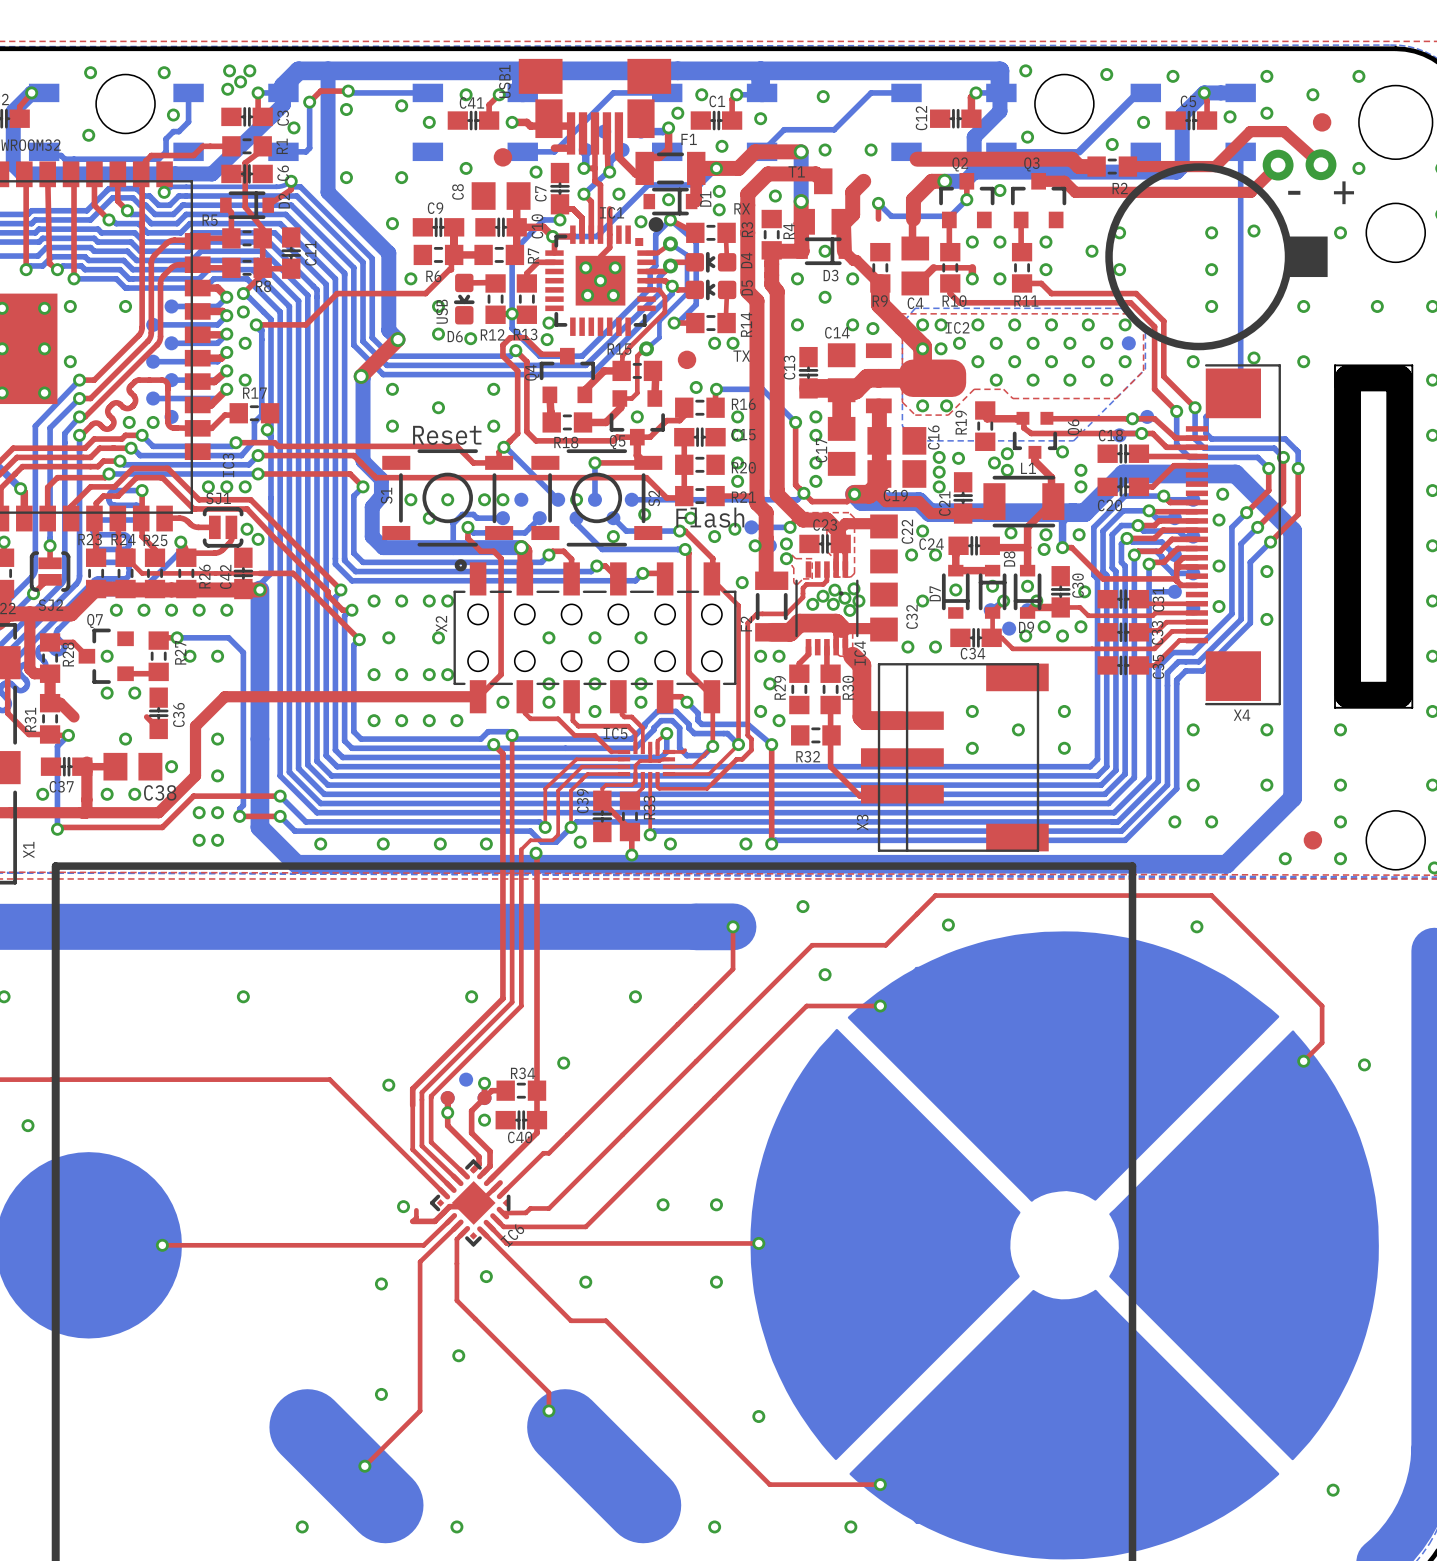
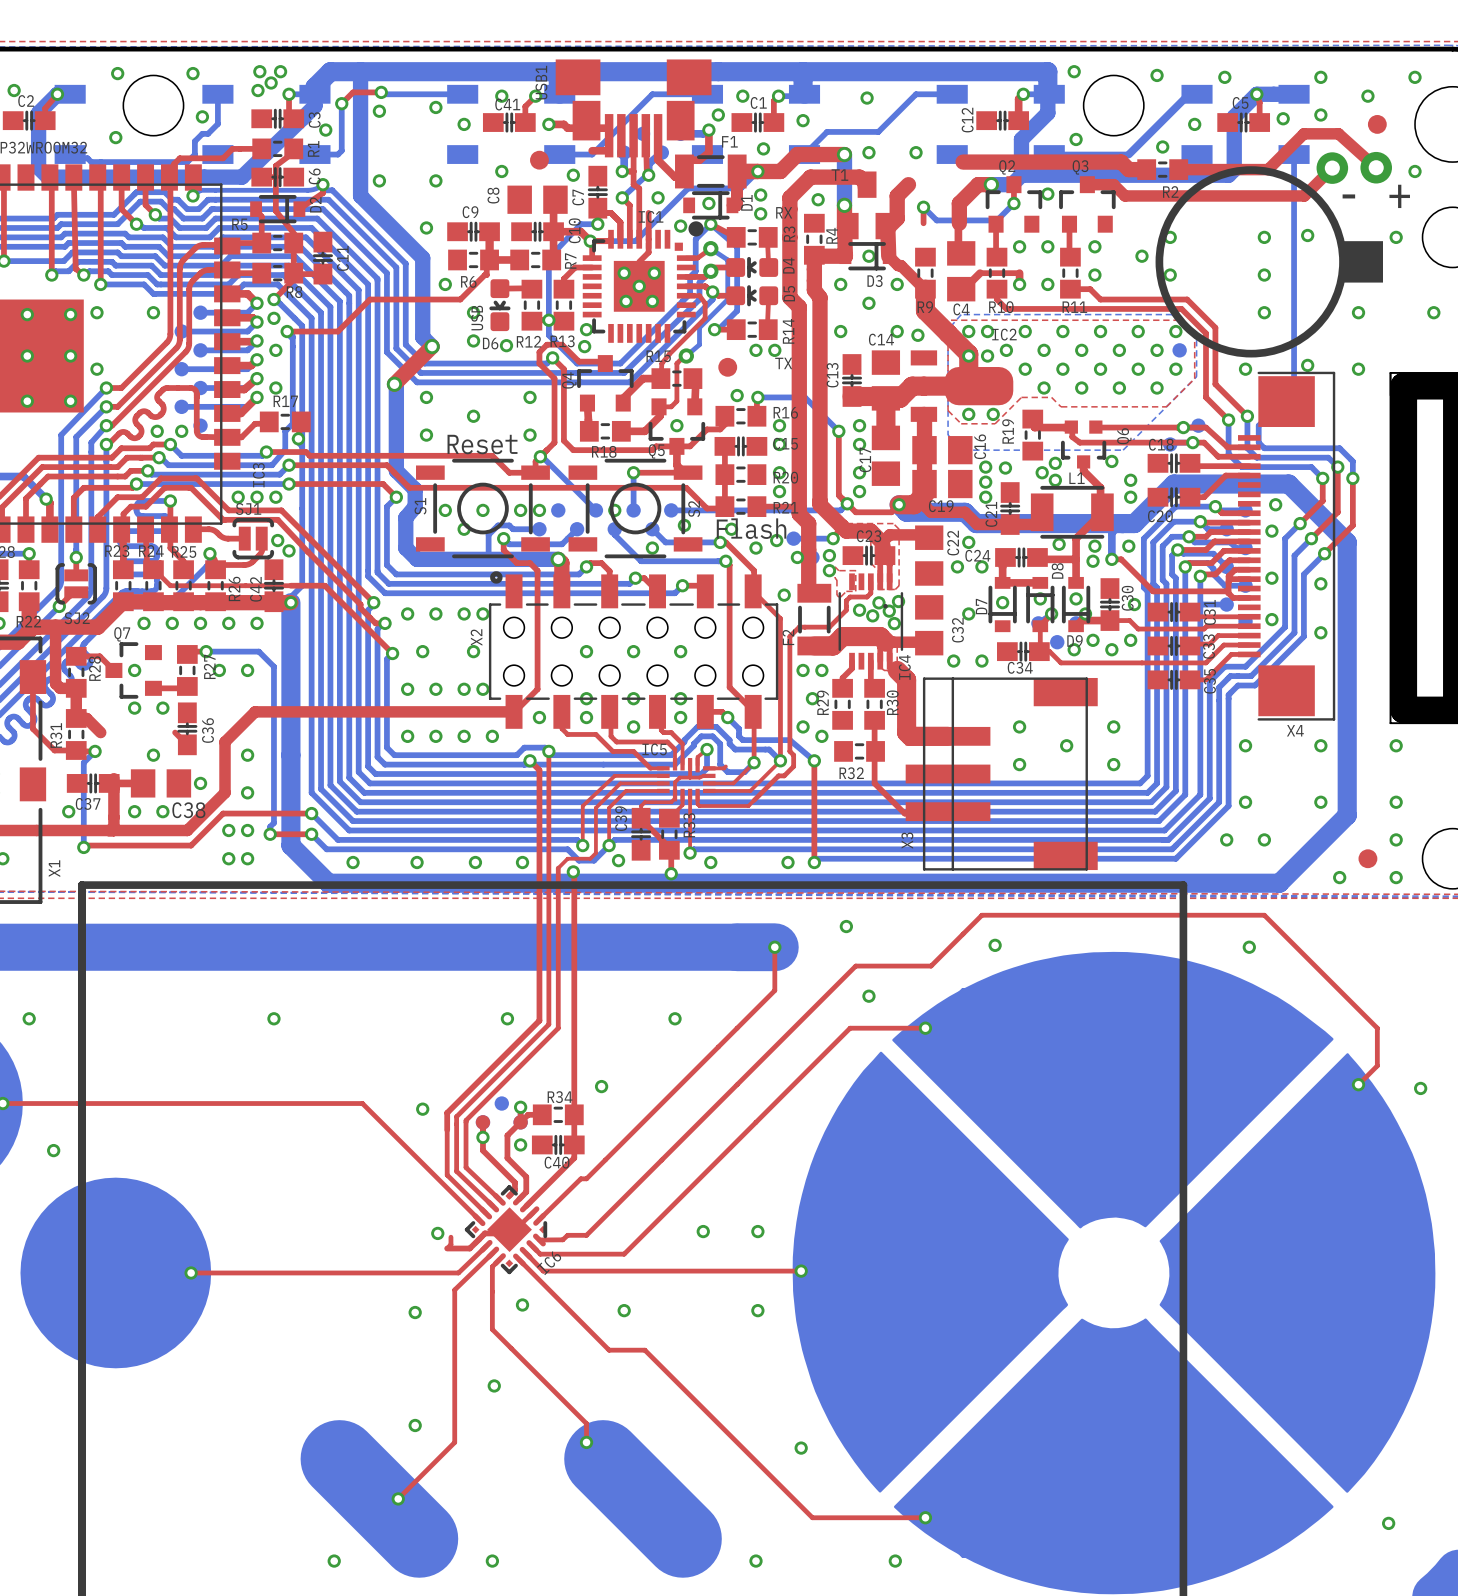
via: (823, 596) -> none
via: none -> (859, 610)
via: (858, 601) -> none
via: none -> (872, 615)
via: (812, 604) -> none
via: (833, 604) -> none

